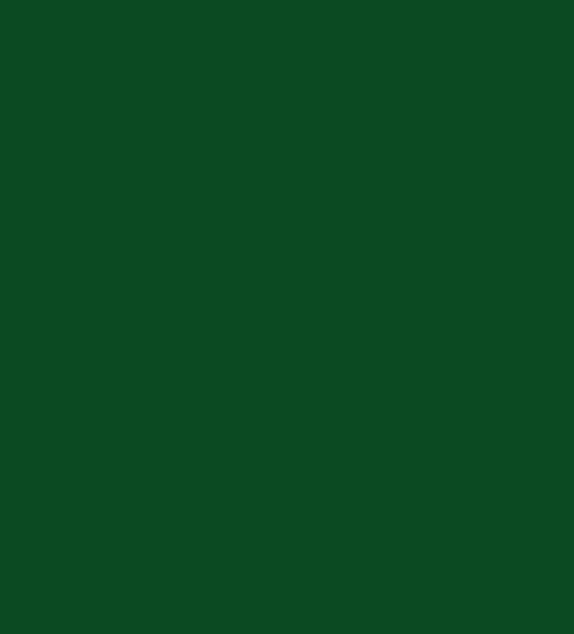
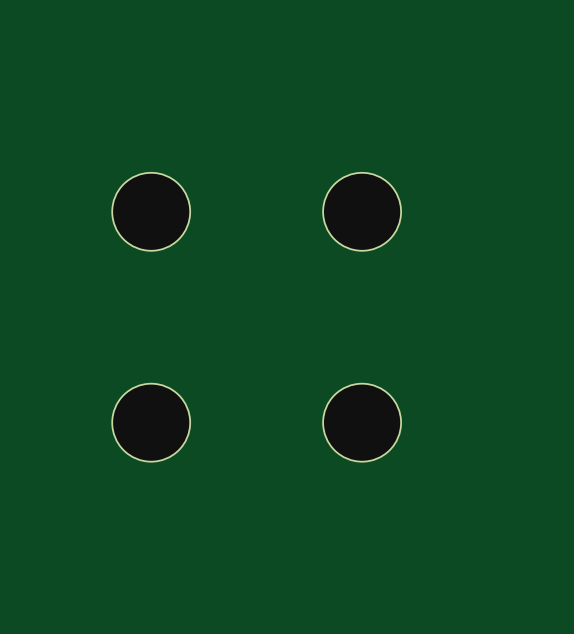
part: none -> (151, 211)
part: none -> (362, 211)
part: none -> (151, 422)
part: none -> (362, 422)

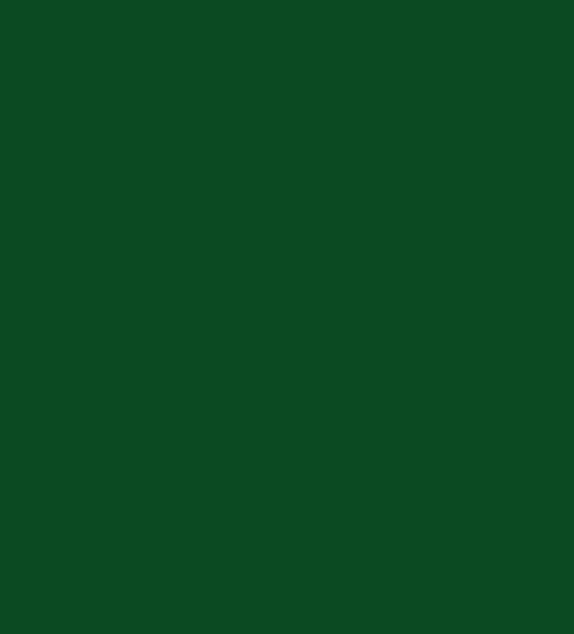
part: (151, 211) -> none
part: (362, 211) -> none
part: (151, 422) -> none
part: (362, 422) -> none

